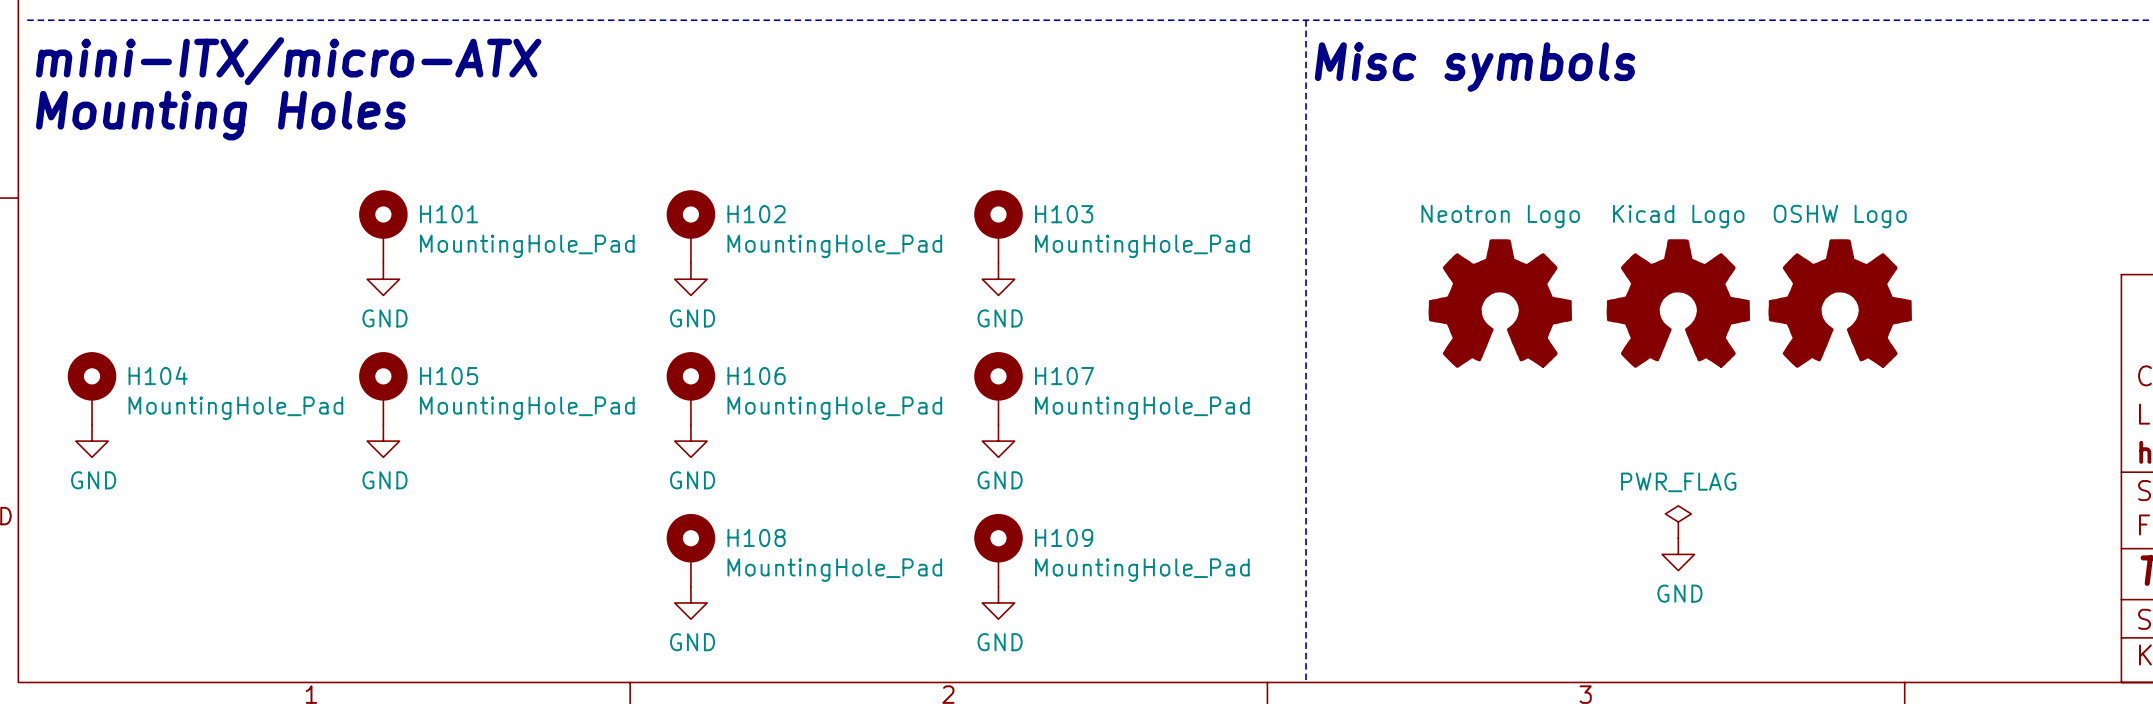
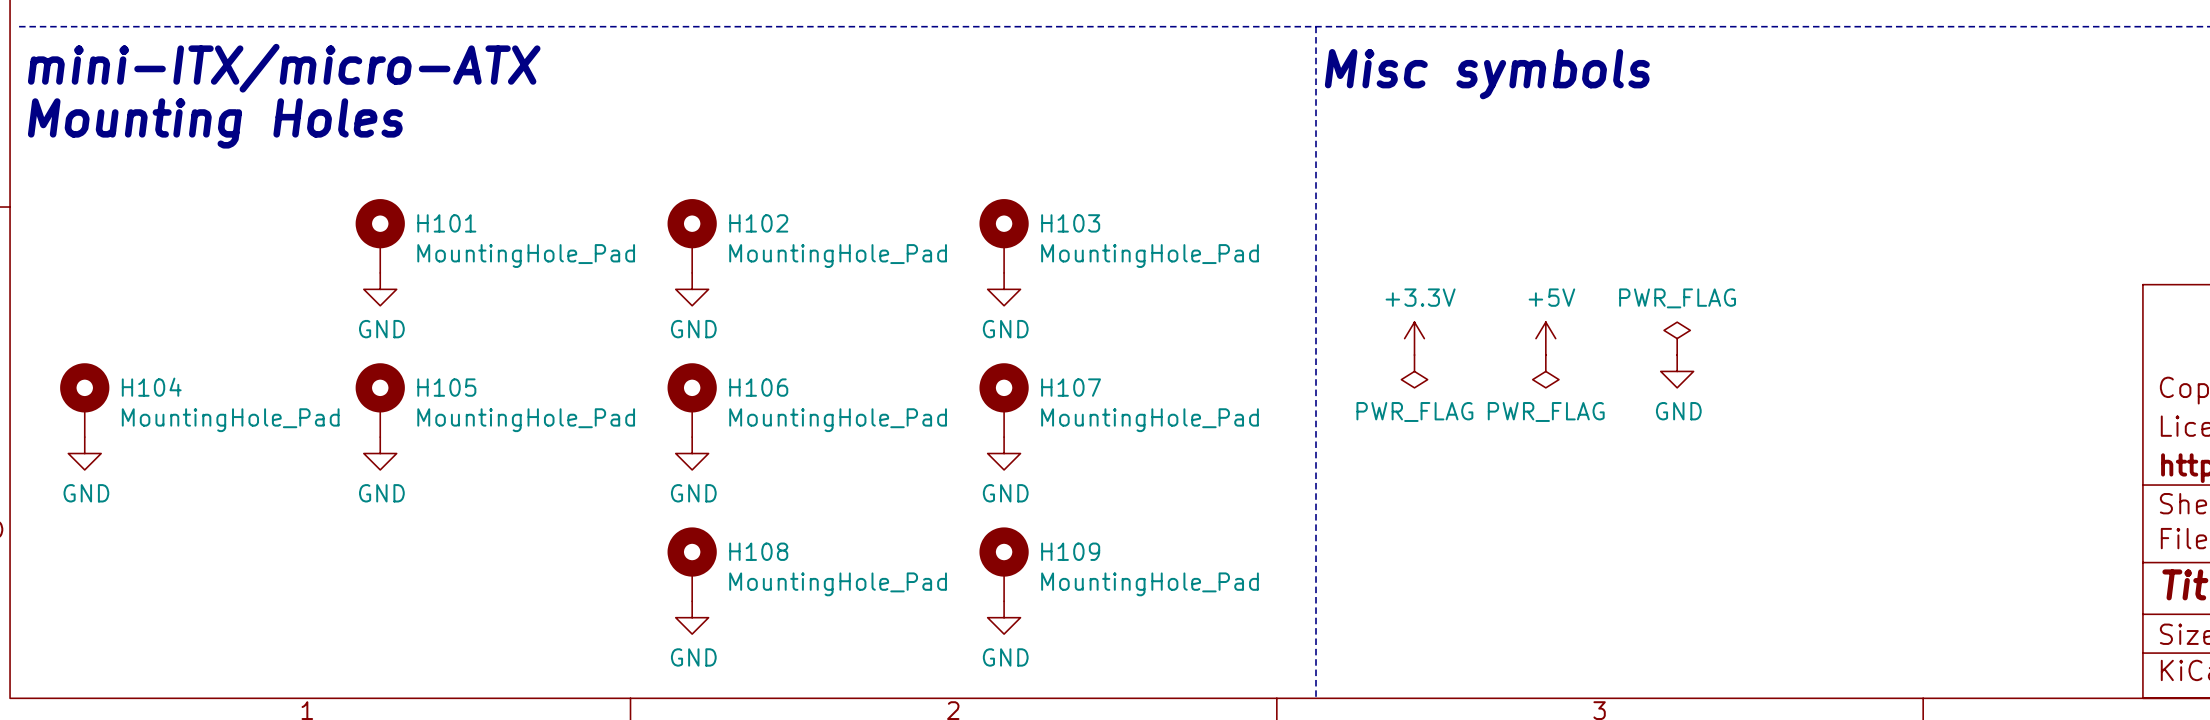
part: Neotron Logo (1500, 303) -> none
part: Kicad Logo (1678, 303) -> none
part: OSHW Logo (1840, 303) -> none
power symbol: none -> +3.3V (1414, 338)
power symbol: none -> +5V (1545, 338)
power symbol: none -> PWR_FLAG (1677, 338)
power symbol: none -> PWR_FLAG (1414, 371)
power symbol: none -> PWR_FLAG (1545, 371)
power symbol: PWR_FLAG (1678, 522) -> none
power symbol position: GND (1678, 554) -> GND (1677, 371)

